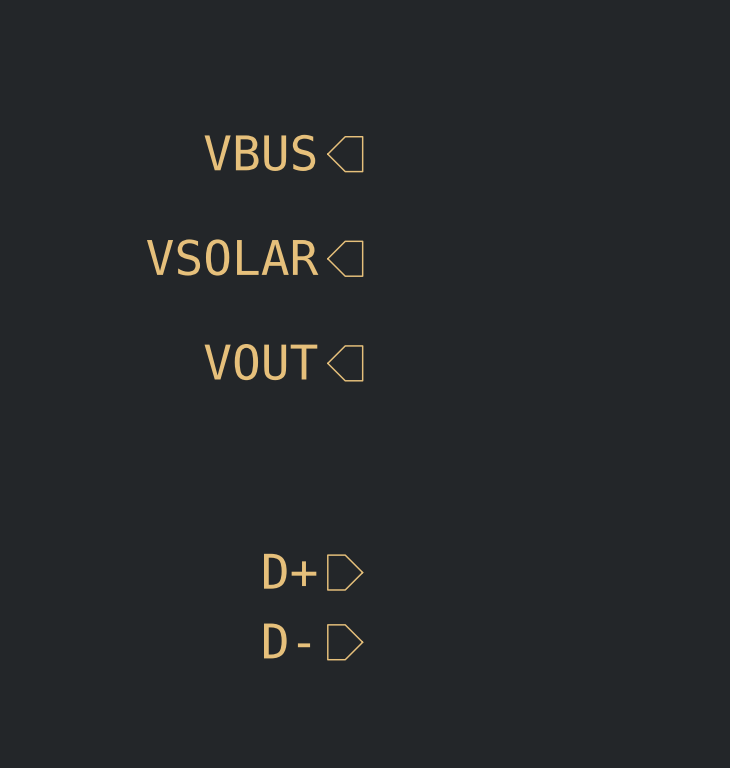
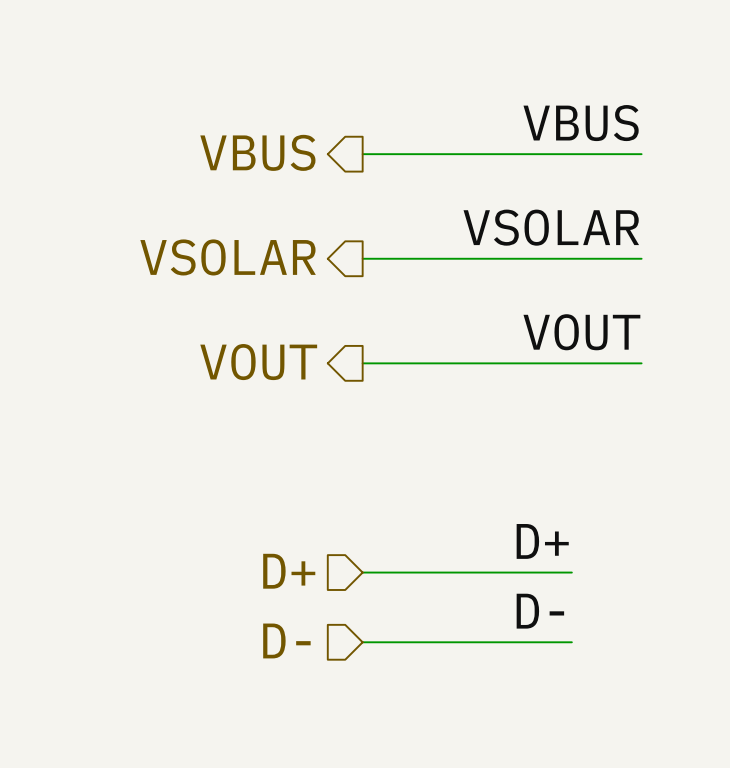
label: none -> VBUS (581, 123)
wire: none -> (362, 154) (641, 154)
label: none -> VSOLAR (551, 227)
wire: none -> (362, 258) (641, 258)
label: none -> VOUT (581, 332)
wire: none -> (362, 363) (641, 363)
label: none -> D+ (542, 541)
wire: none -> (362, 572) (571, 572)
label: none -> D- (540, 611)
wire: none -> (362, 642) (571, 642)

